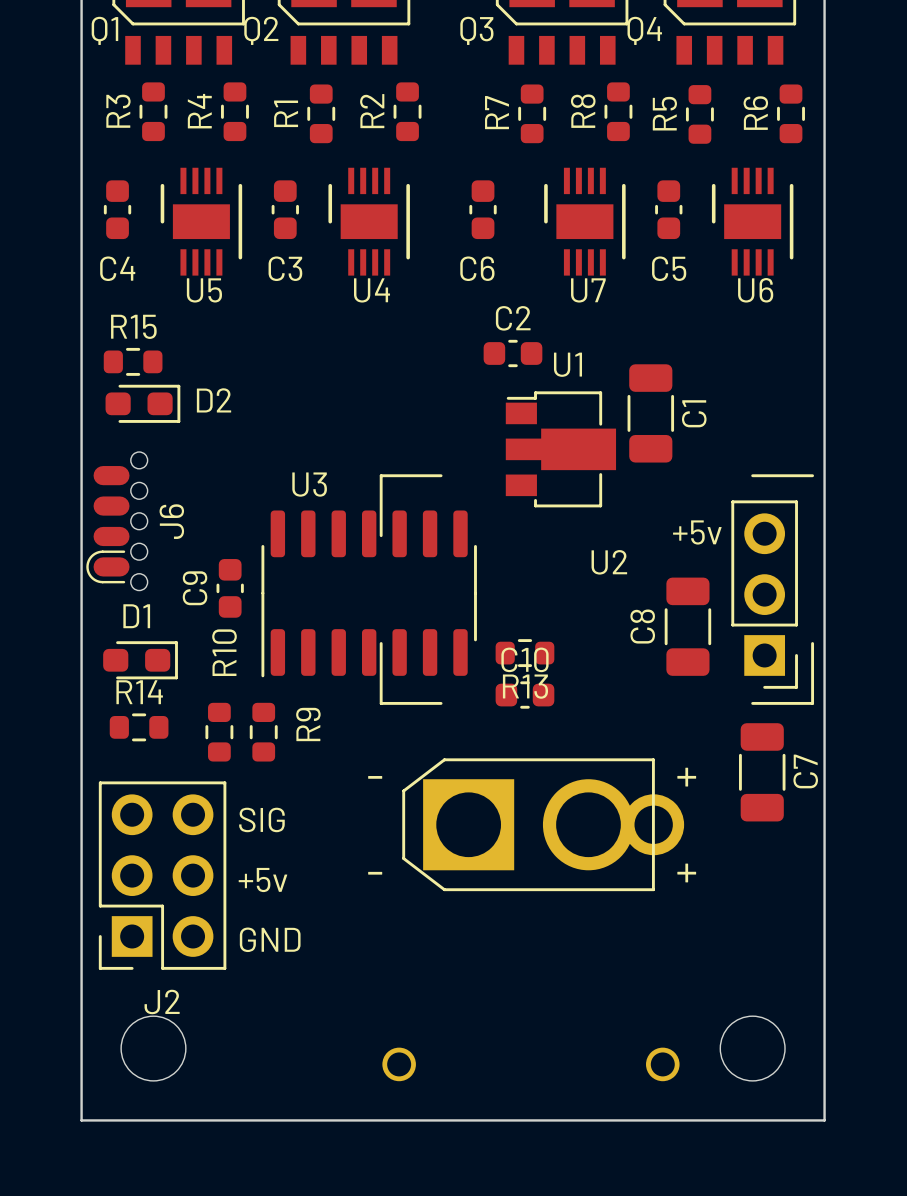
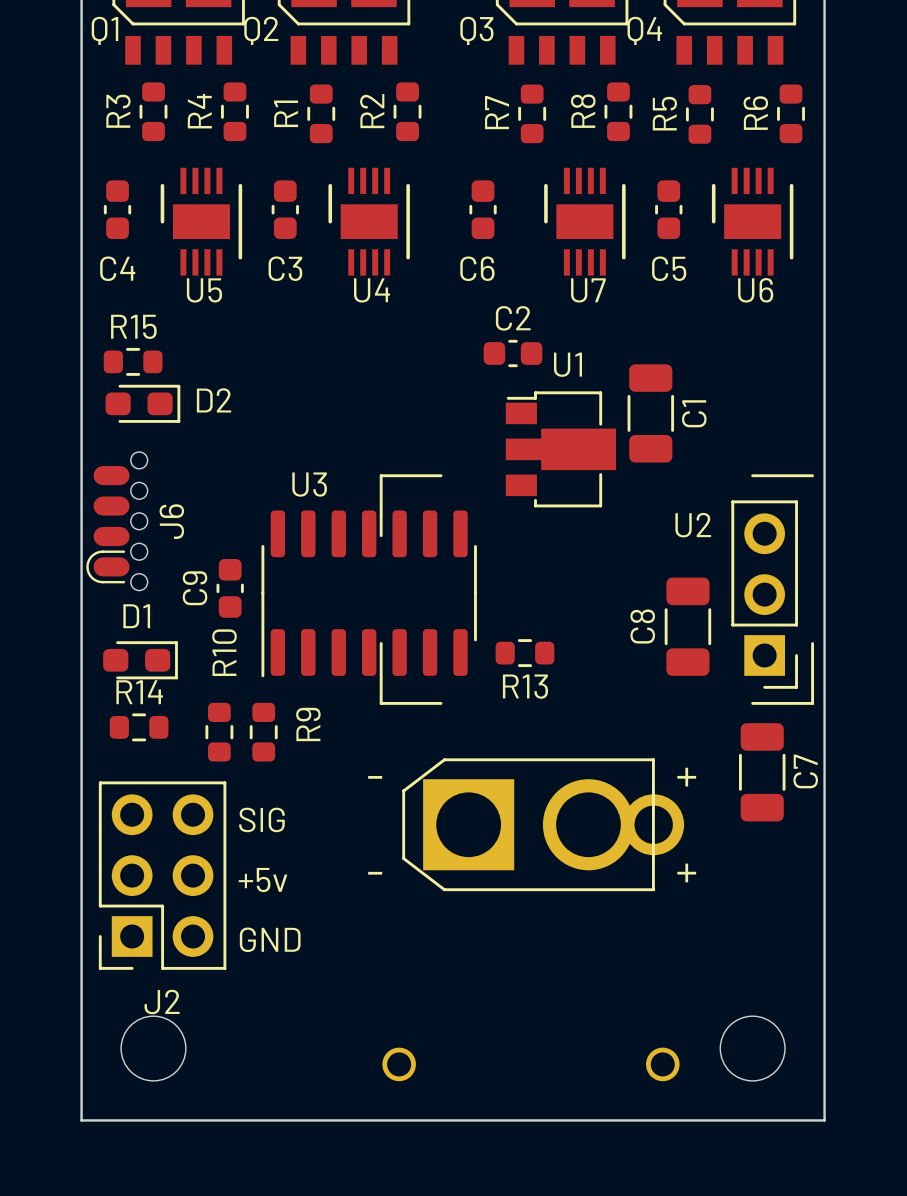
text: +5v (697, 532) -> none
U2 name position: U2 (609, 562) -> U2 (693, 525)
C10: (524, 695) -> none

